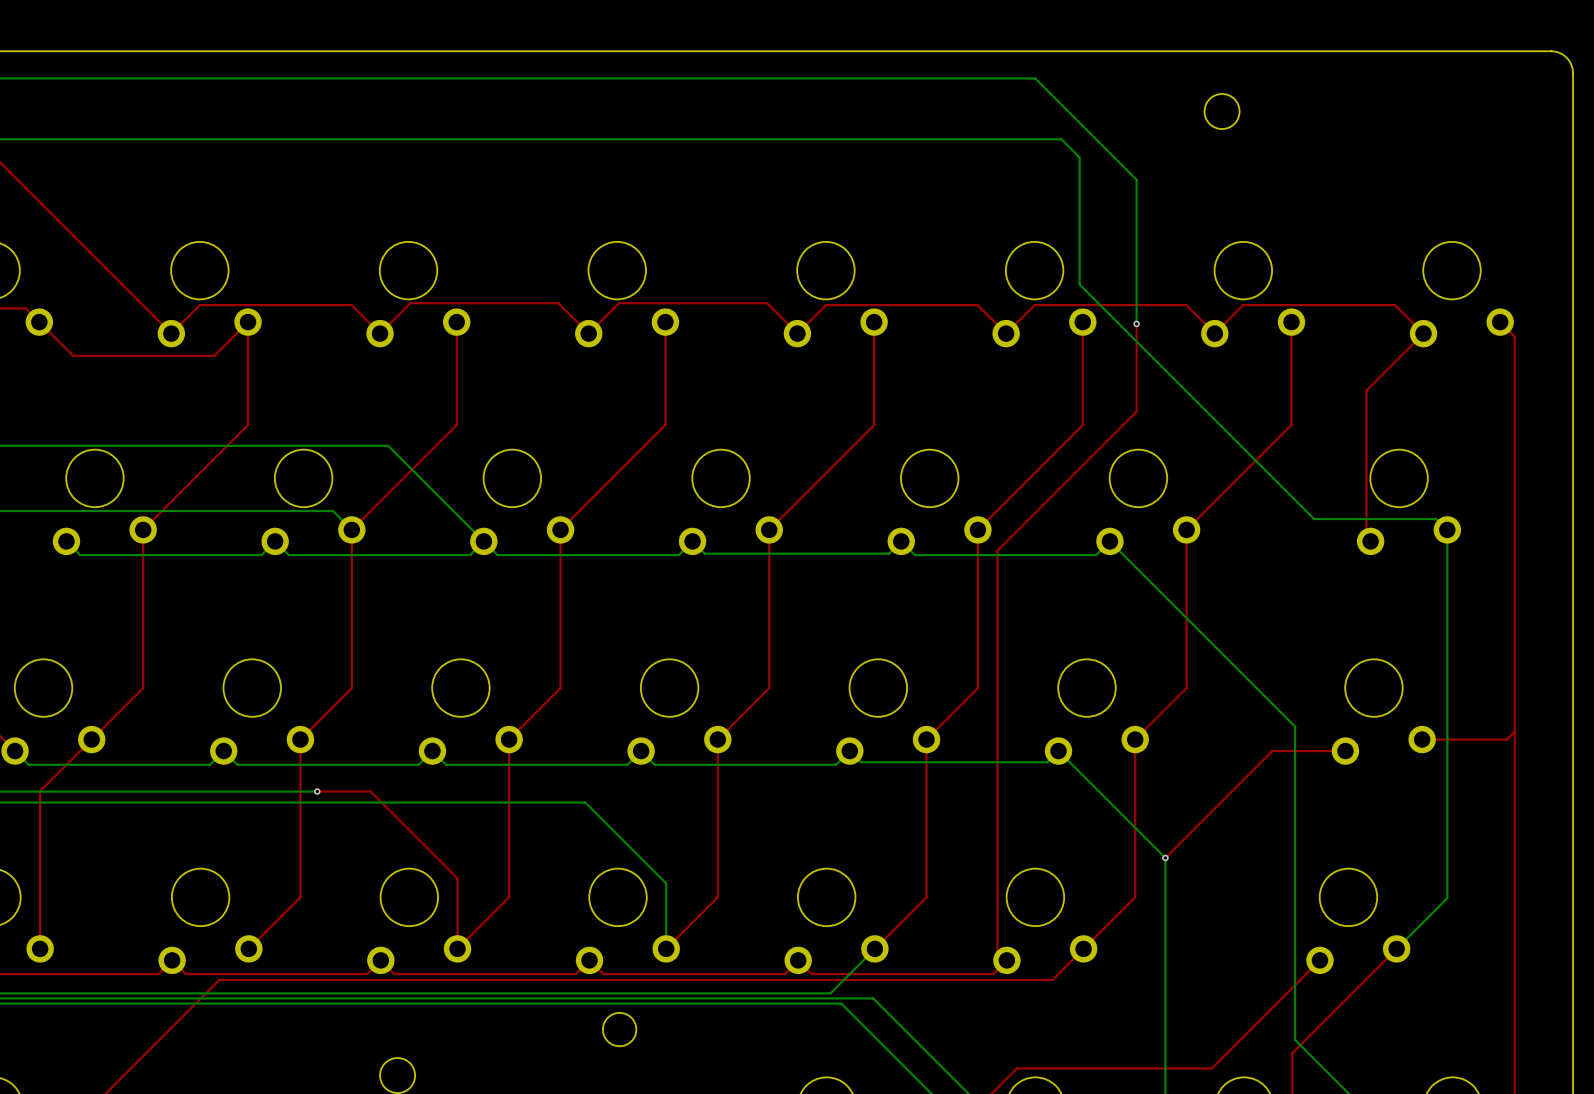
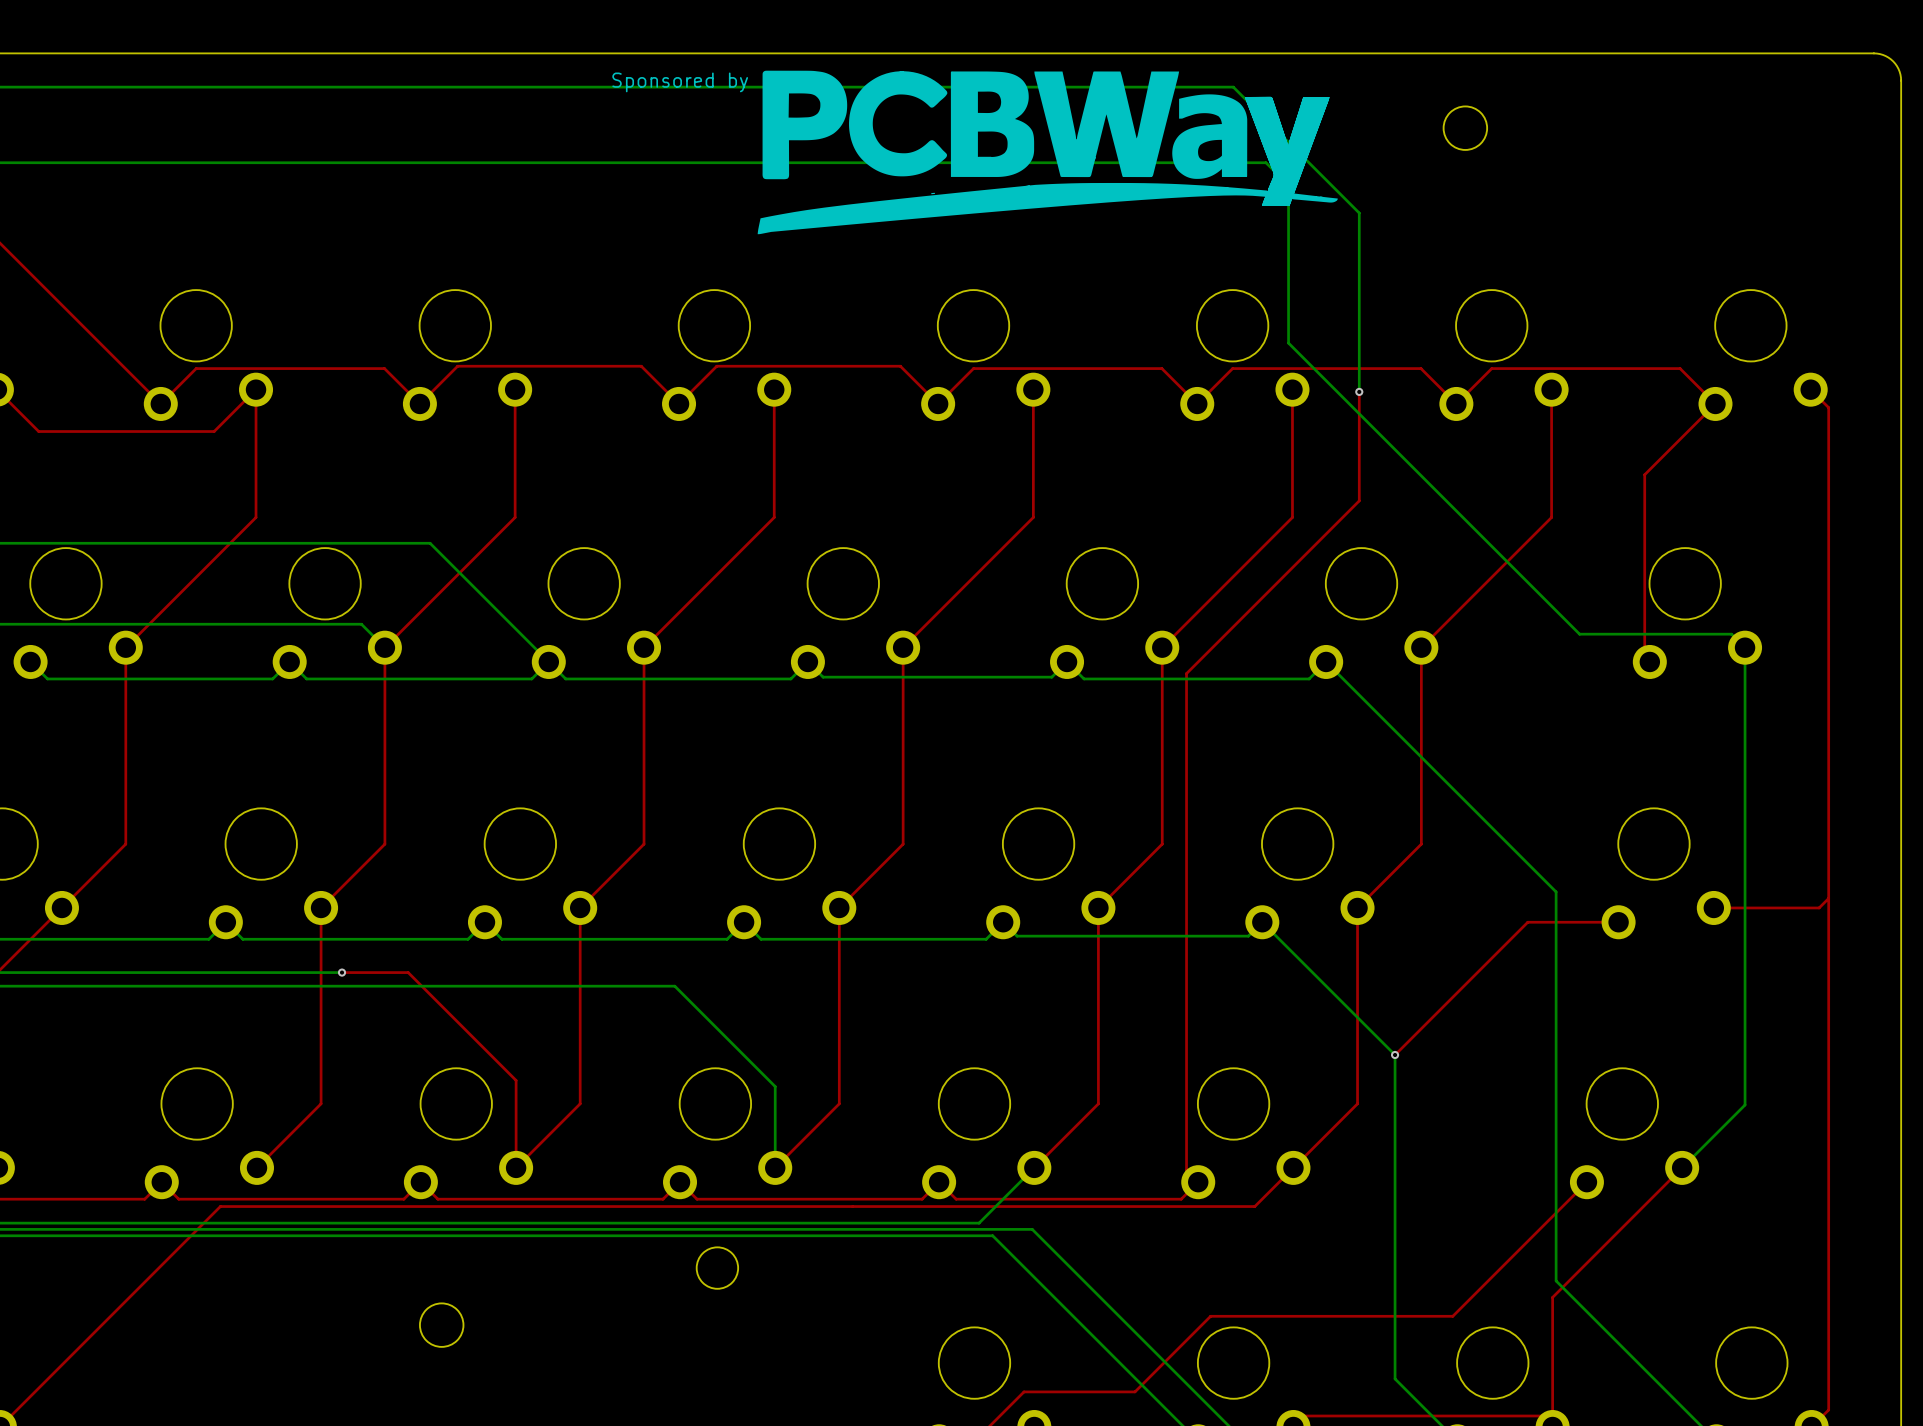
drawing: none -> [757, 70, 1338, 235]
text: none -> Sponsored by (680, 82)

